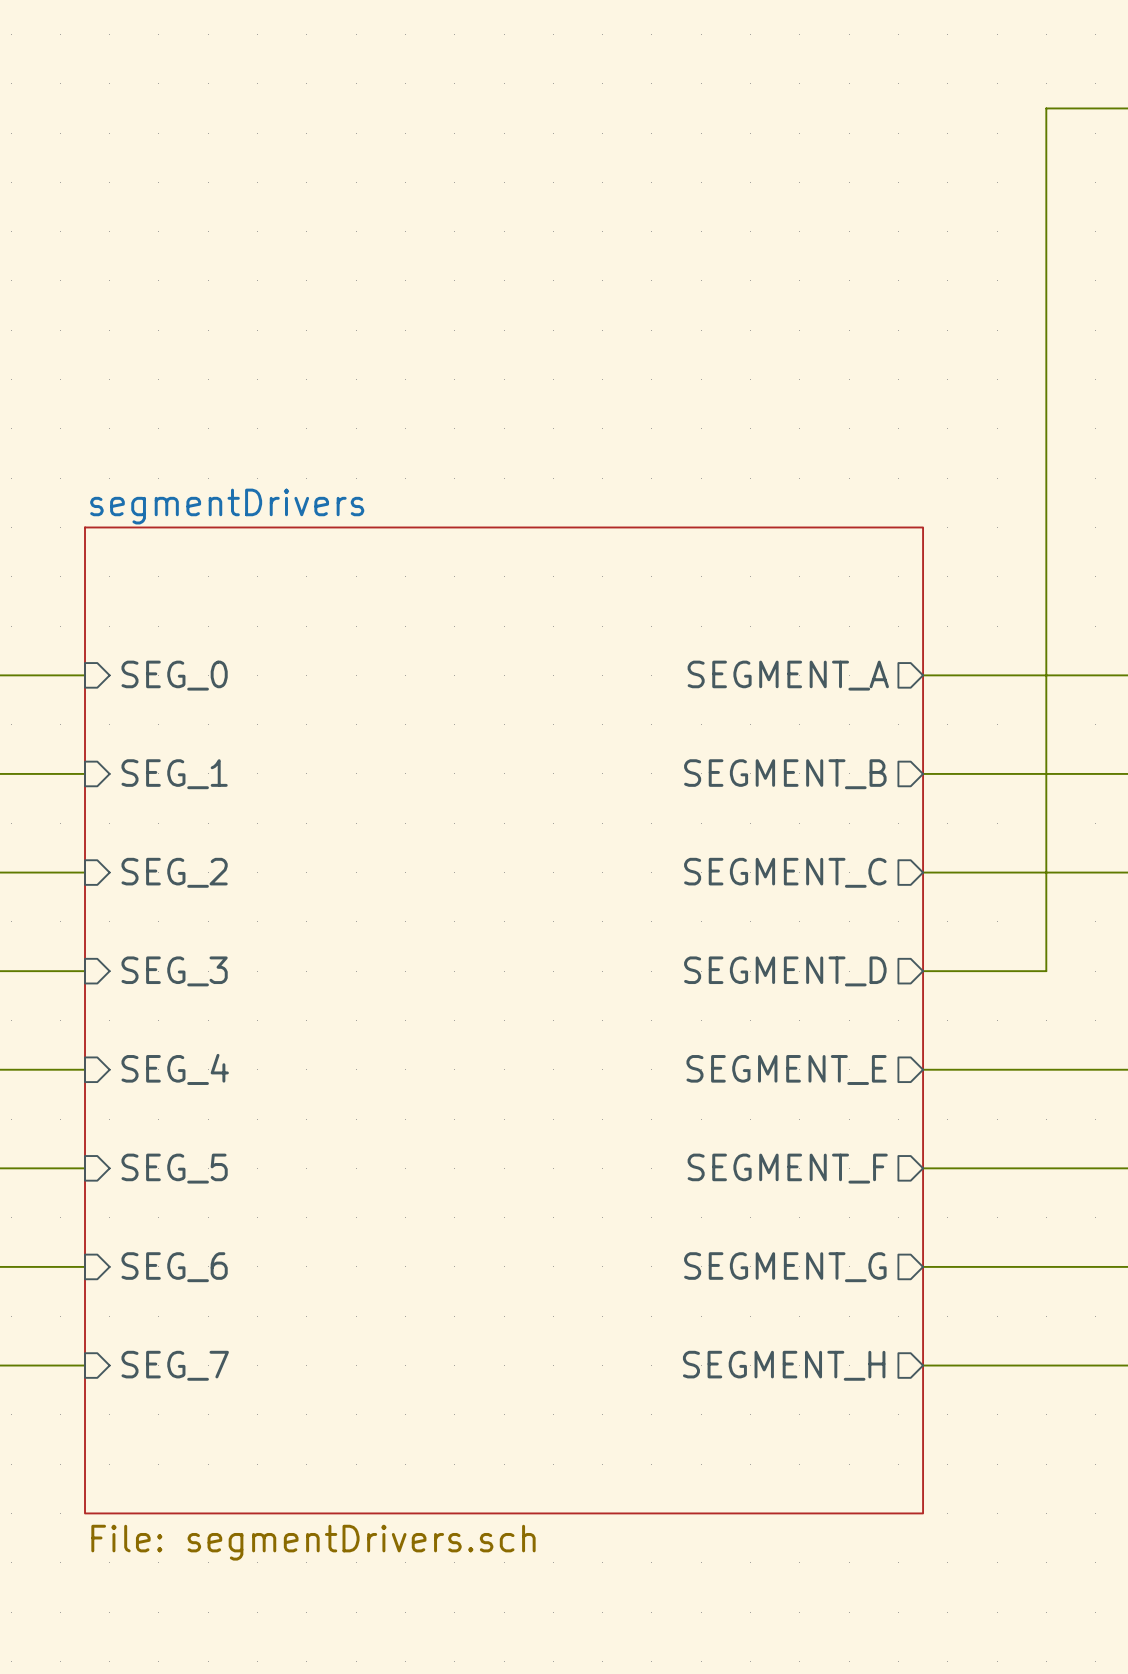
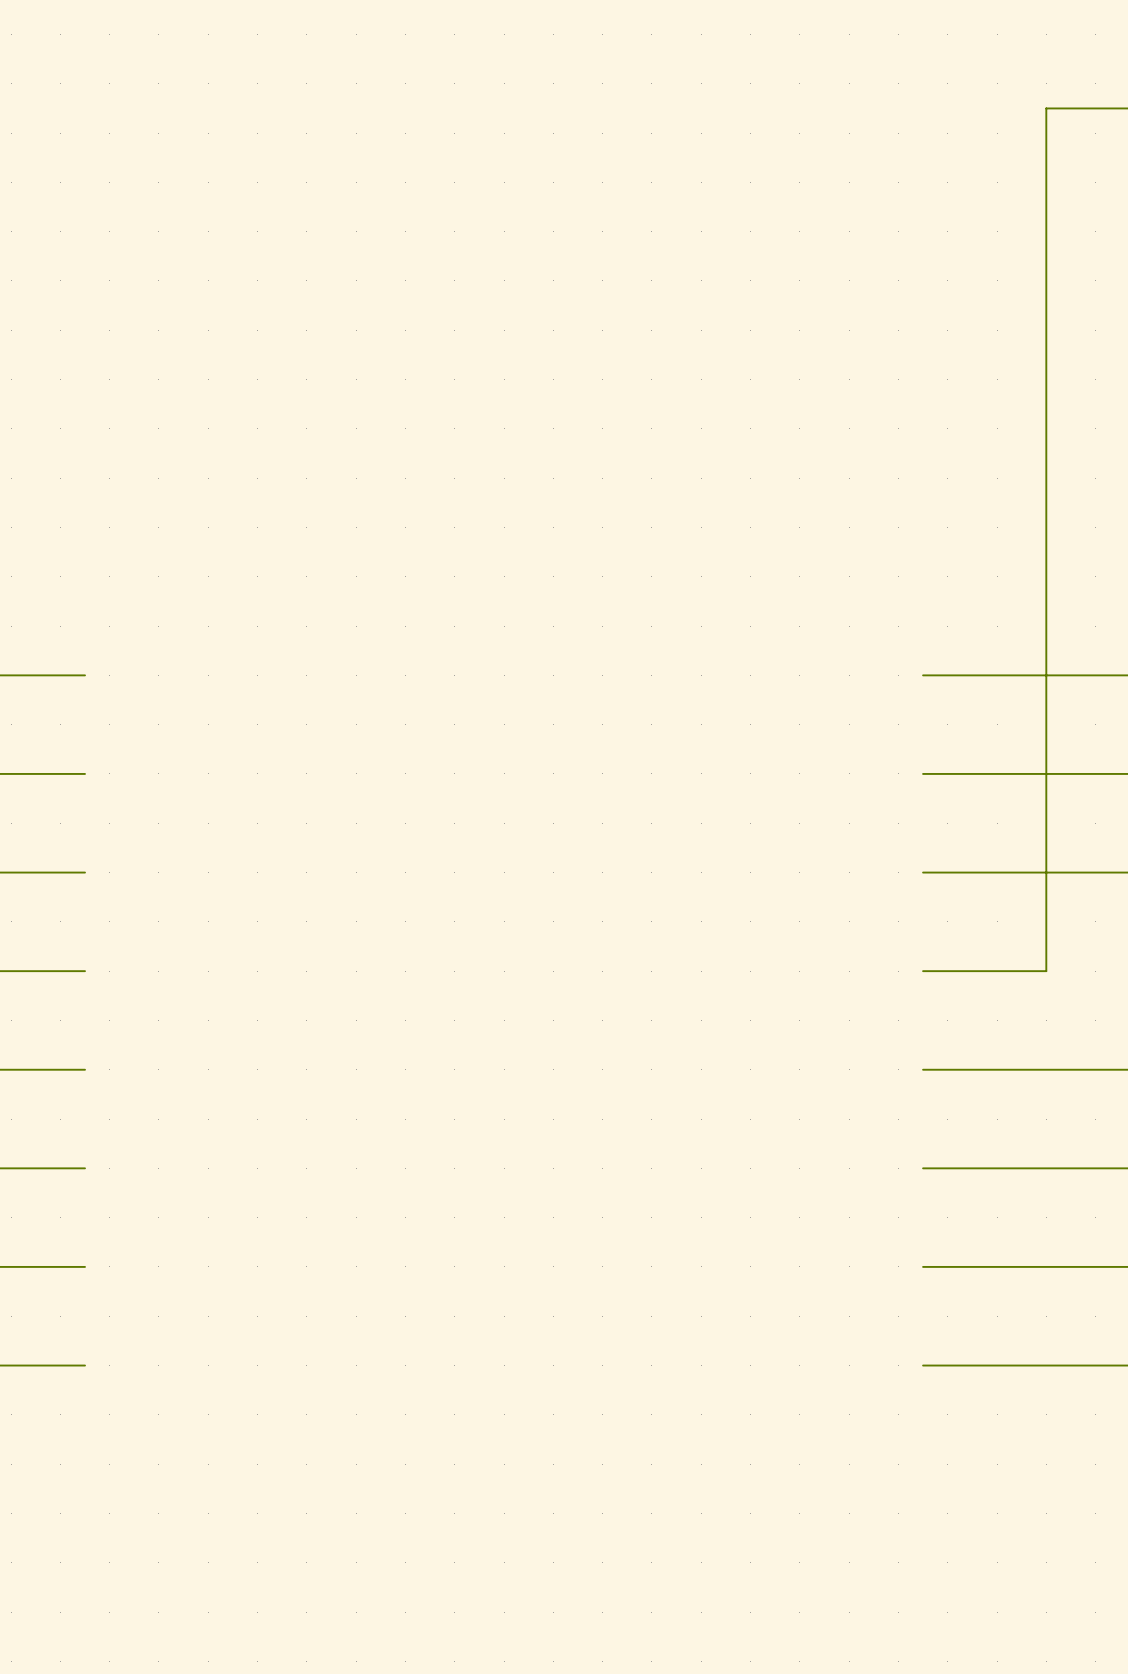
sheet pin: SEG_0 (174, 675) -> none
sheet pin: SEGMENT_A (788, 675) -> none
sheet pin: SEG_1 (174, 774) -> none
sheet pin: SEGMENT_B (785, 774) -> none
sheet pin: SEG_2 (174, 872) -> none
sheet pin: SEGMENT_C (785, 872) -> none
sheet pin: SEG_3 (174, 971) -> none
sheet pin: SEGMENT_D (785, 971) -> none
sheet segmentDrivers: File: segmentDrivers.sch (504, 1020) -> none
sheet pin: SEG_4 (175, 1069) -> none
sheet pin: SEGMENT_E (786, 1070) -> none
sheet pin: SEG_5 (174, 1168) -> none
sheet pin: SEGMENT_F (787, 1168) -> none
sheet pin: SEG_6 (174, 1267) -> none
sheet pin: SEGMENT_G (785, 1267) -> none
sheet pin: SEG_7 (175, 1365) -> none
sheet pin: SEGMENT_H (784, 1365) -> none

